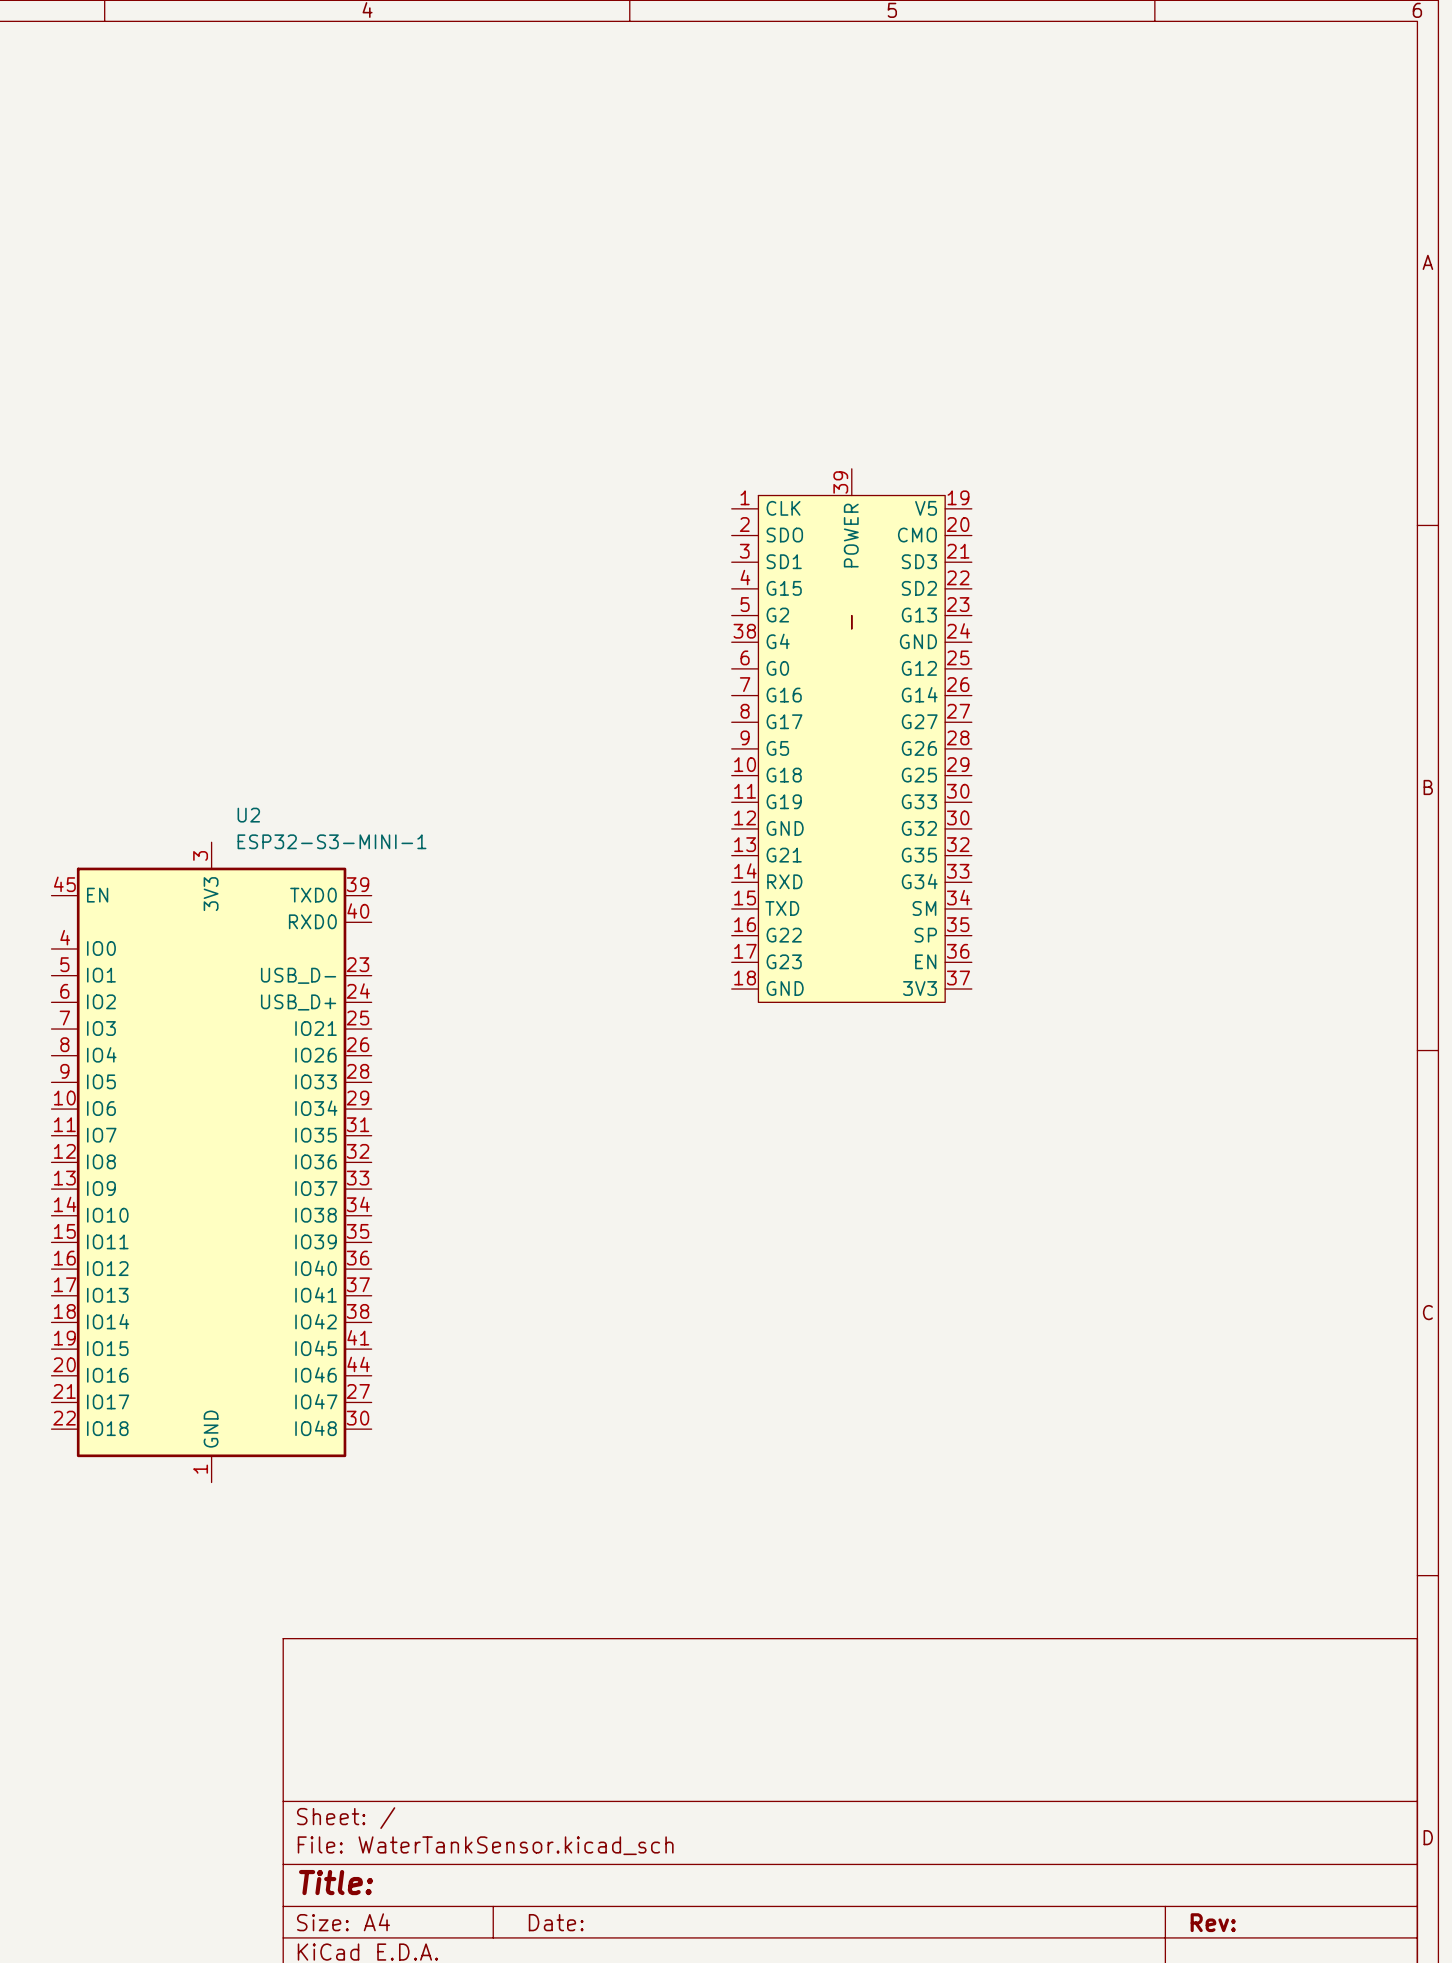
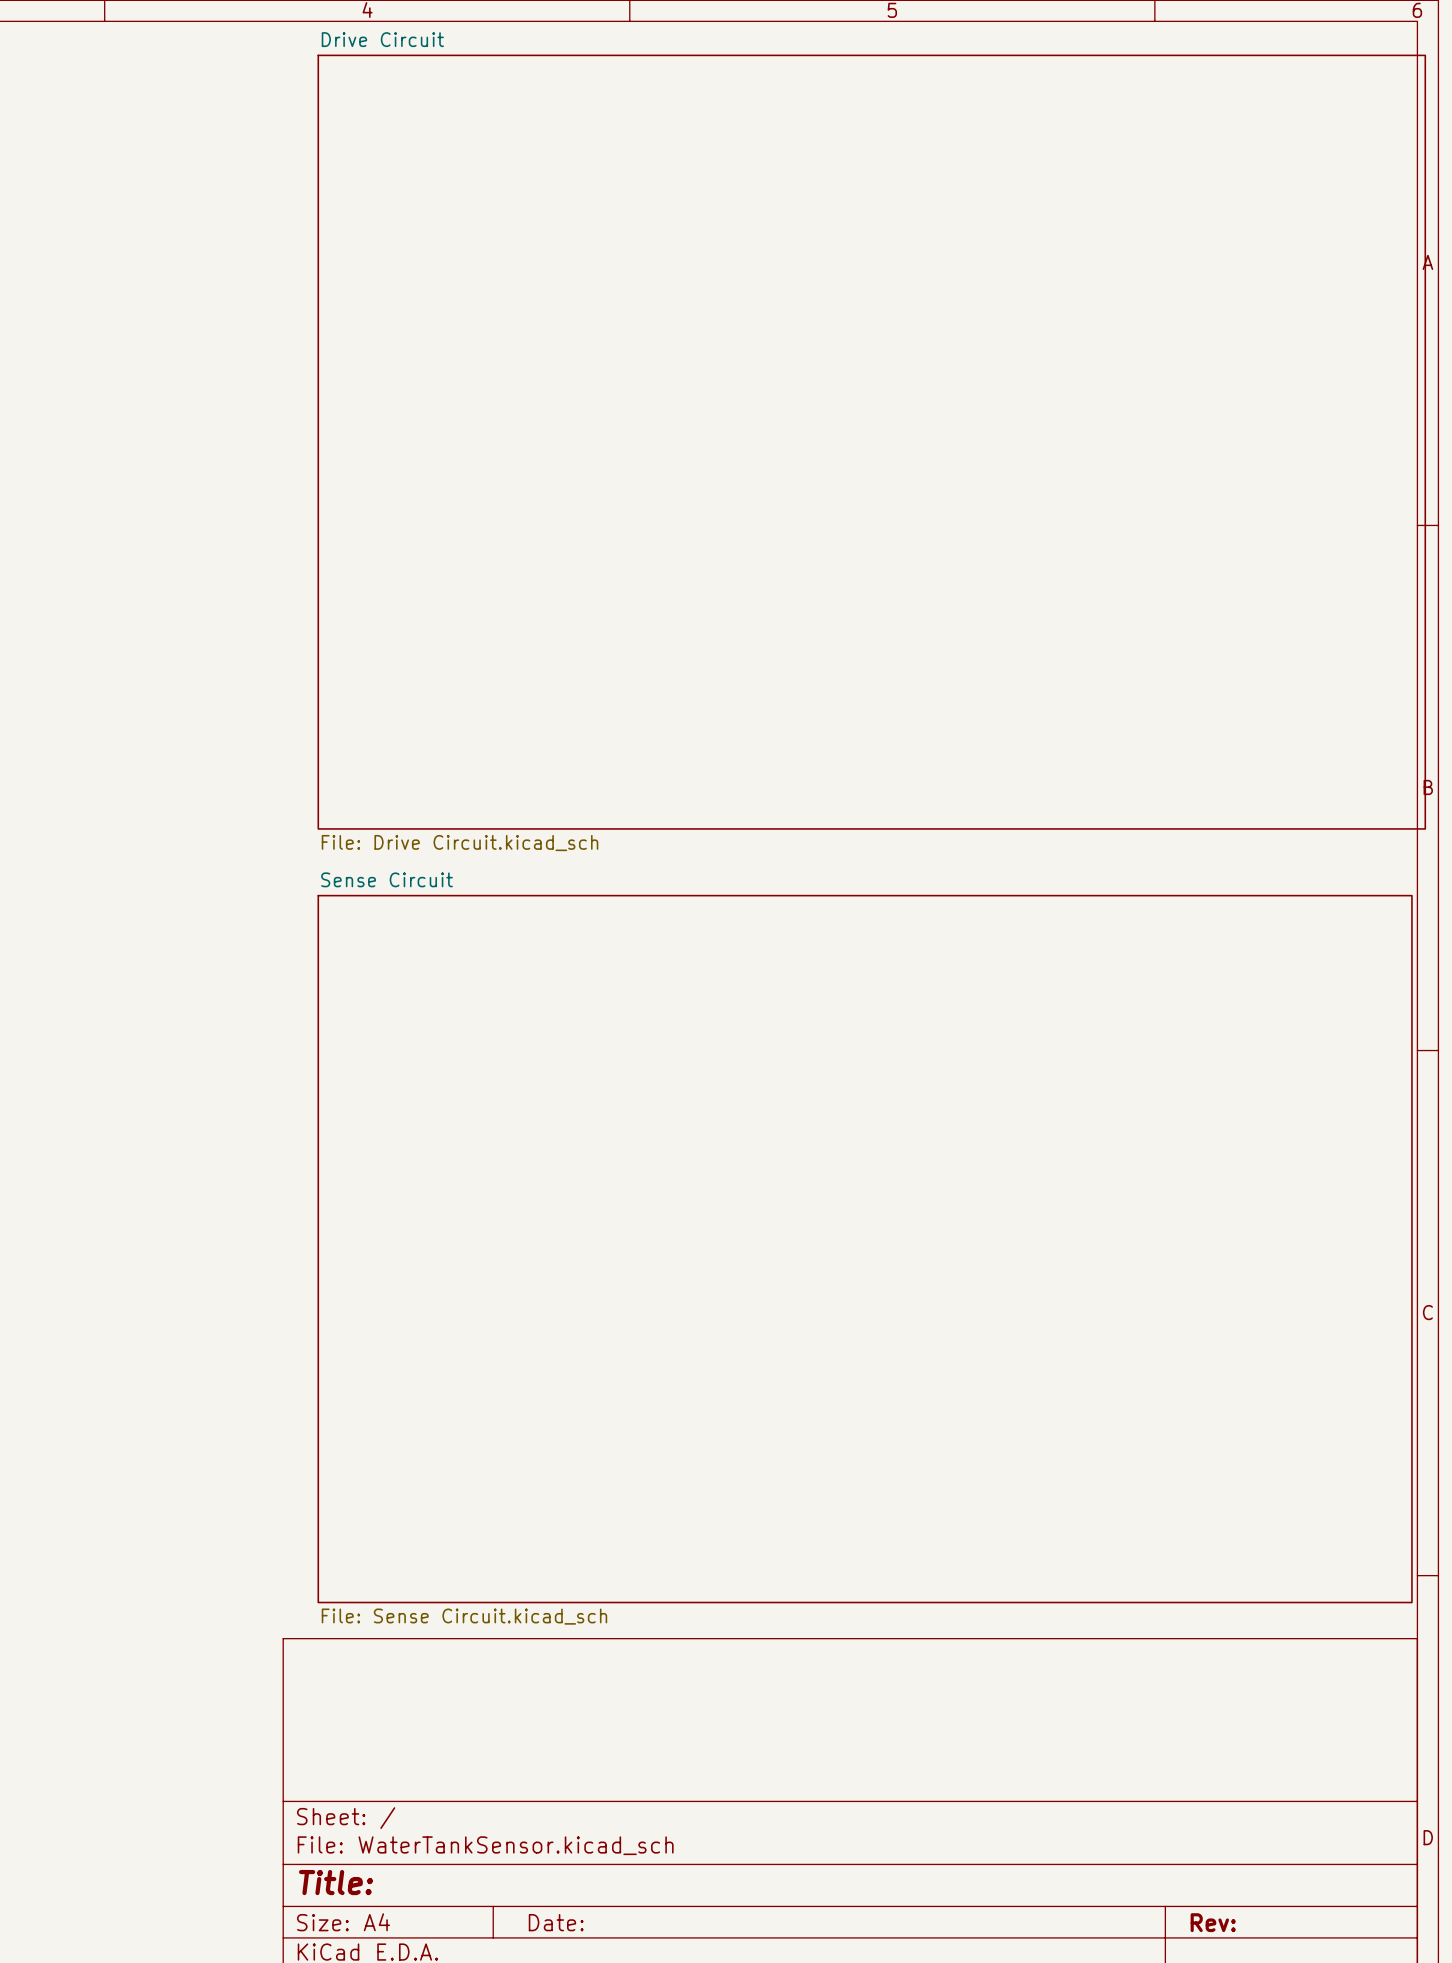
sheet Drive Circuit: none -> File: Drive Circuit.kicad_sch (871, 442)
part: (851, 735) -> none
U2: ESP32-S3-MINI-1 (211, 1162) -> none
sheet Sense Circuit: none -> File: Sense Circuit.kicad_sch (865, 1249)

